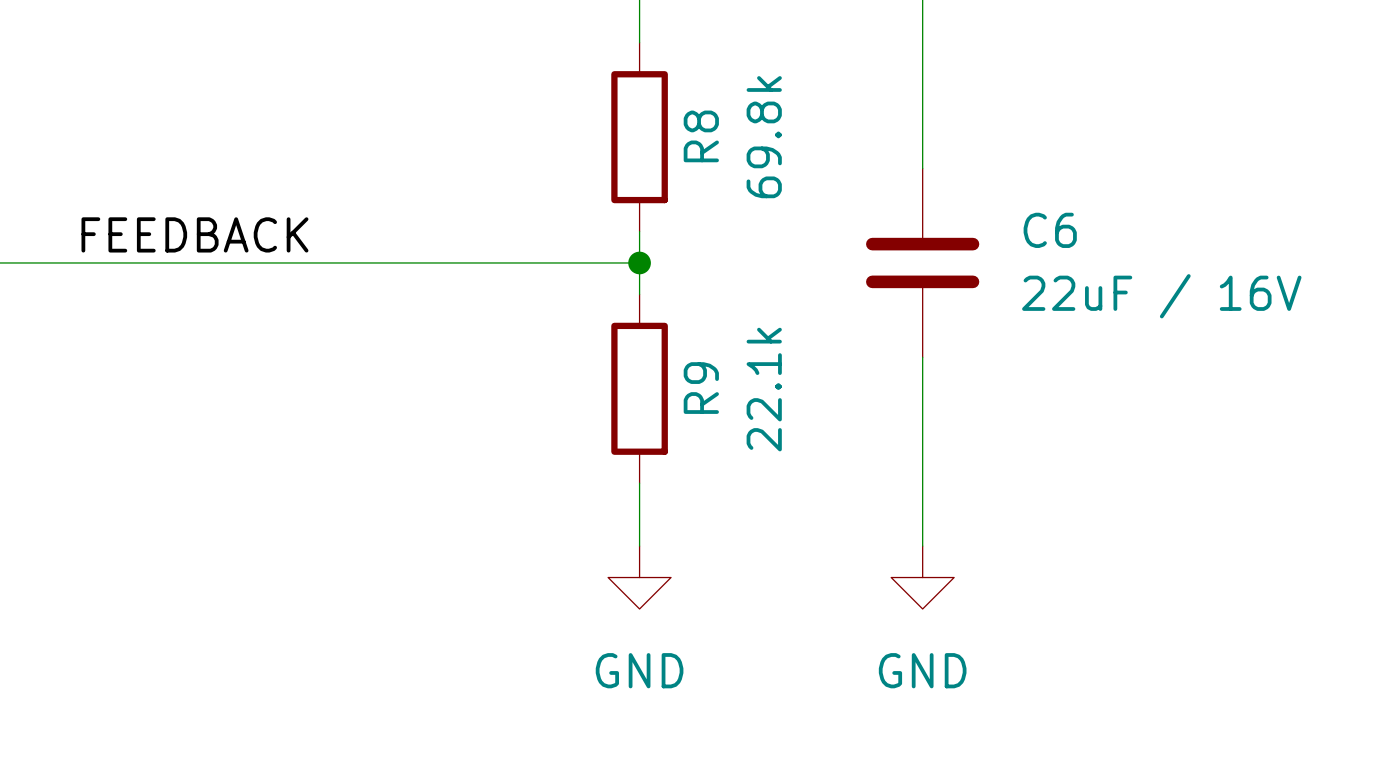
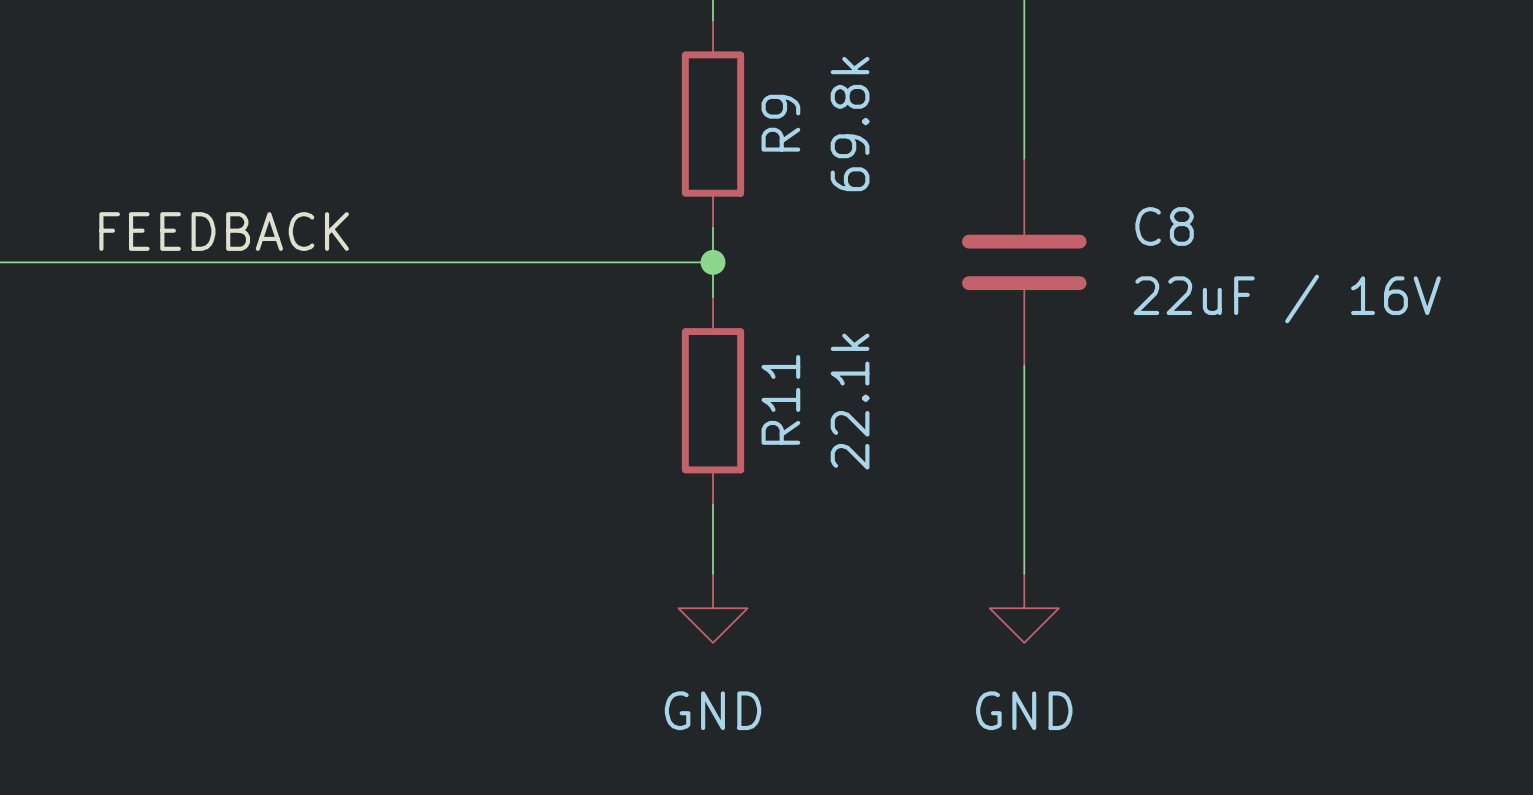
R8 name: R8 (701, 136) -> R9 (780, 123)
C6 name: C6 (1050, 230) -> C8 (1164, 226)
R9 name: R9 (701, 388) -> R11 (780, 399)

